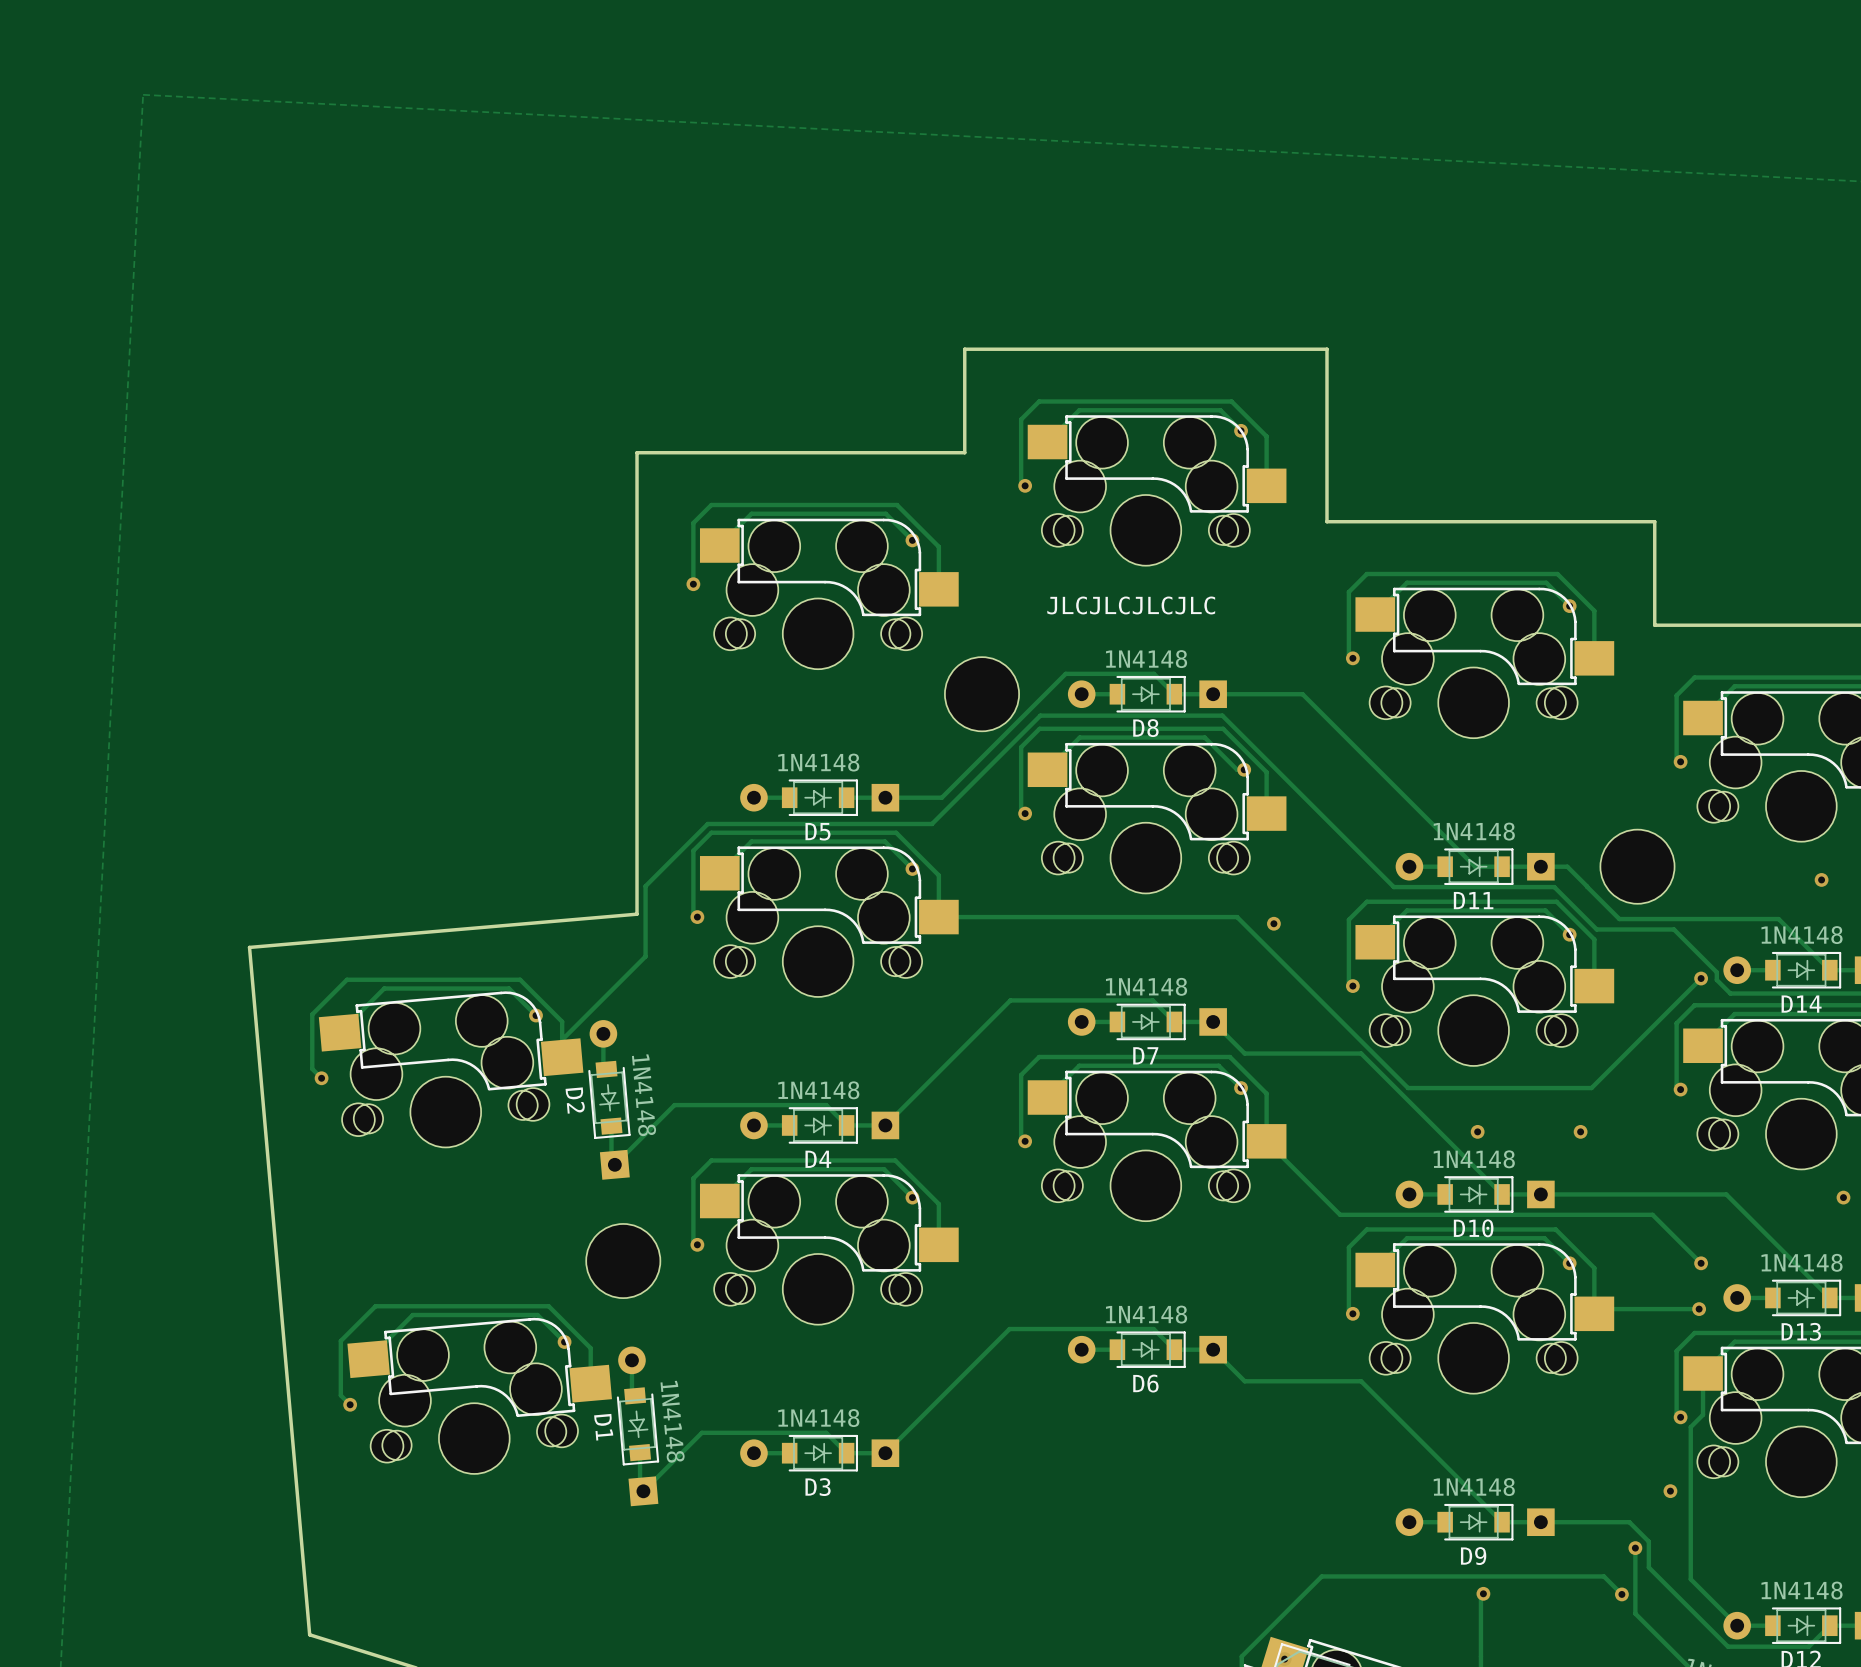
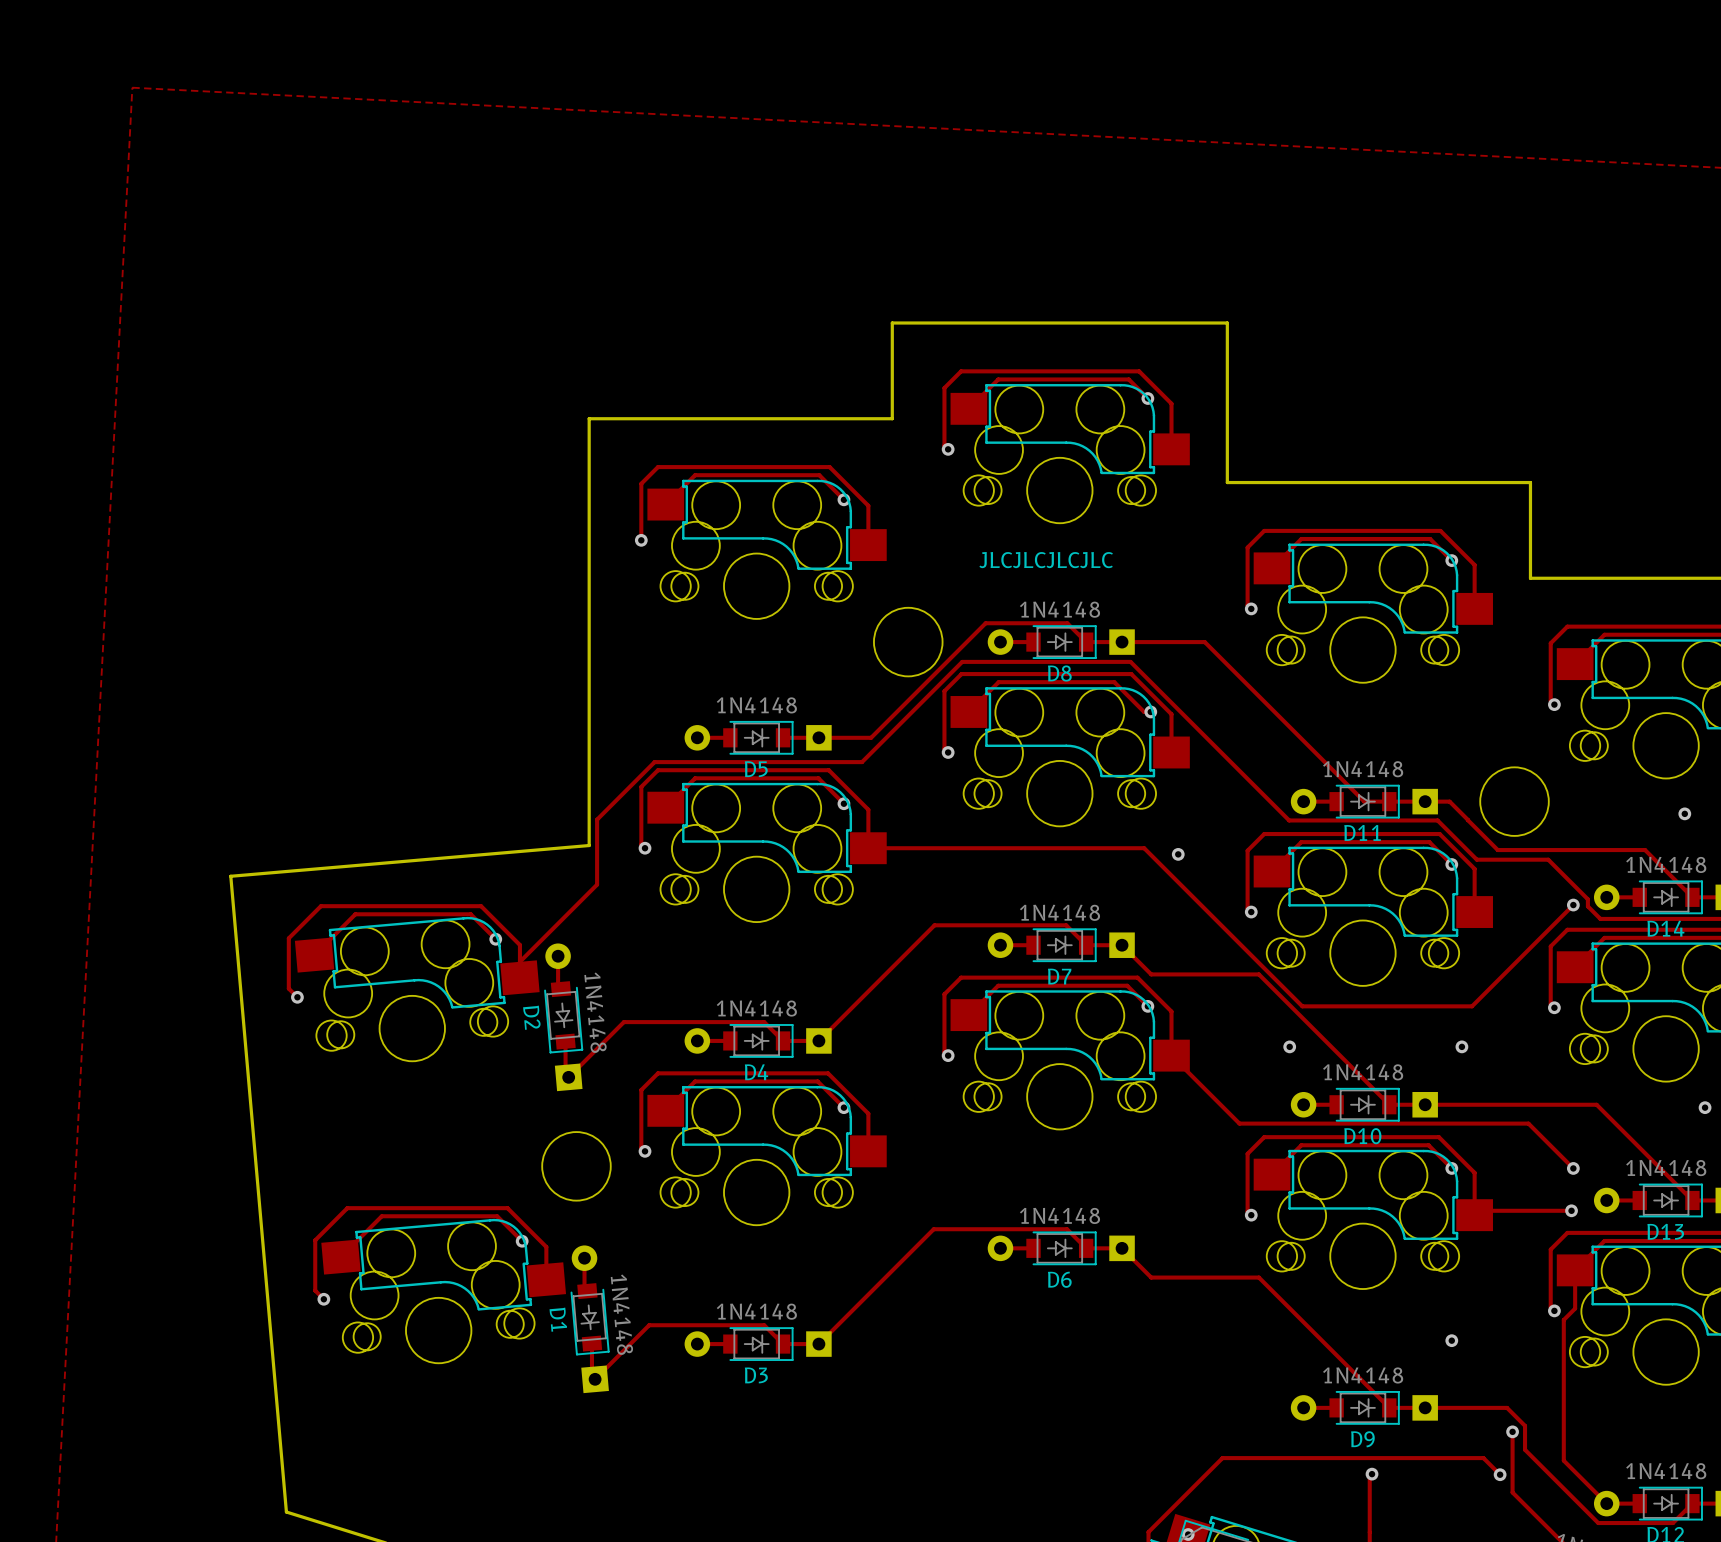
via position: (1477, 1131) -> (1289, 1046)
via: none -> (1451, 1340)
via: (1670, 1491) -> none

